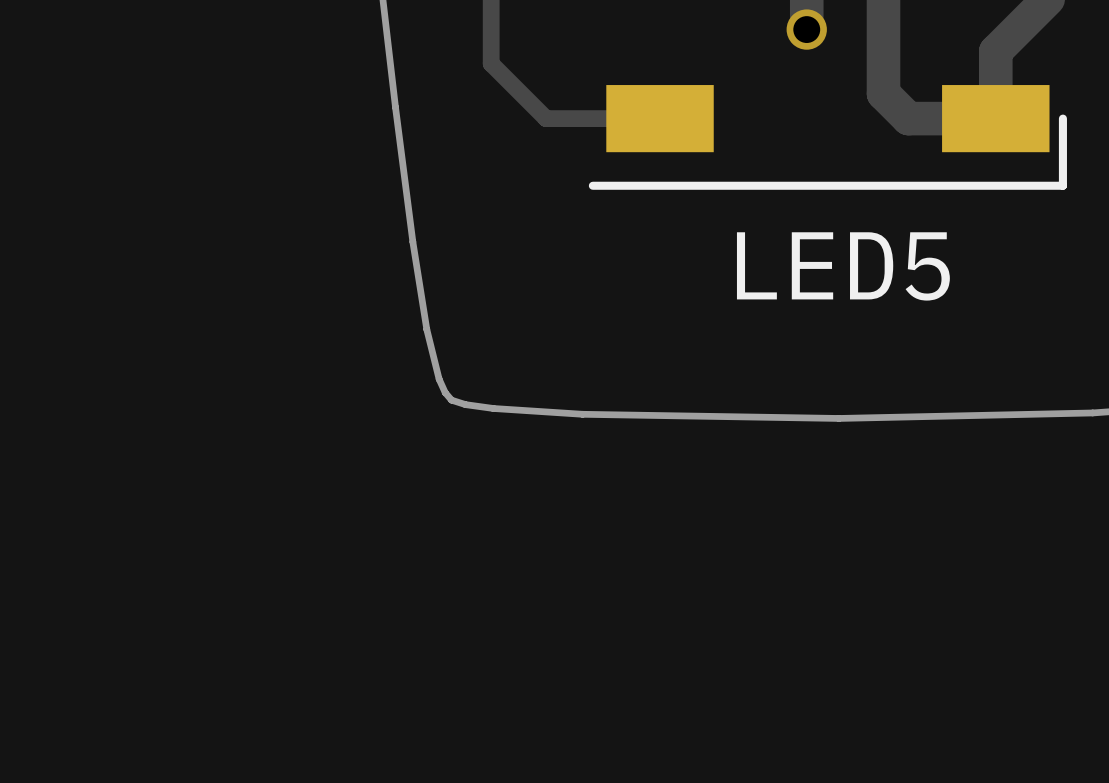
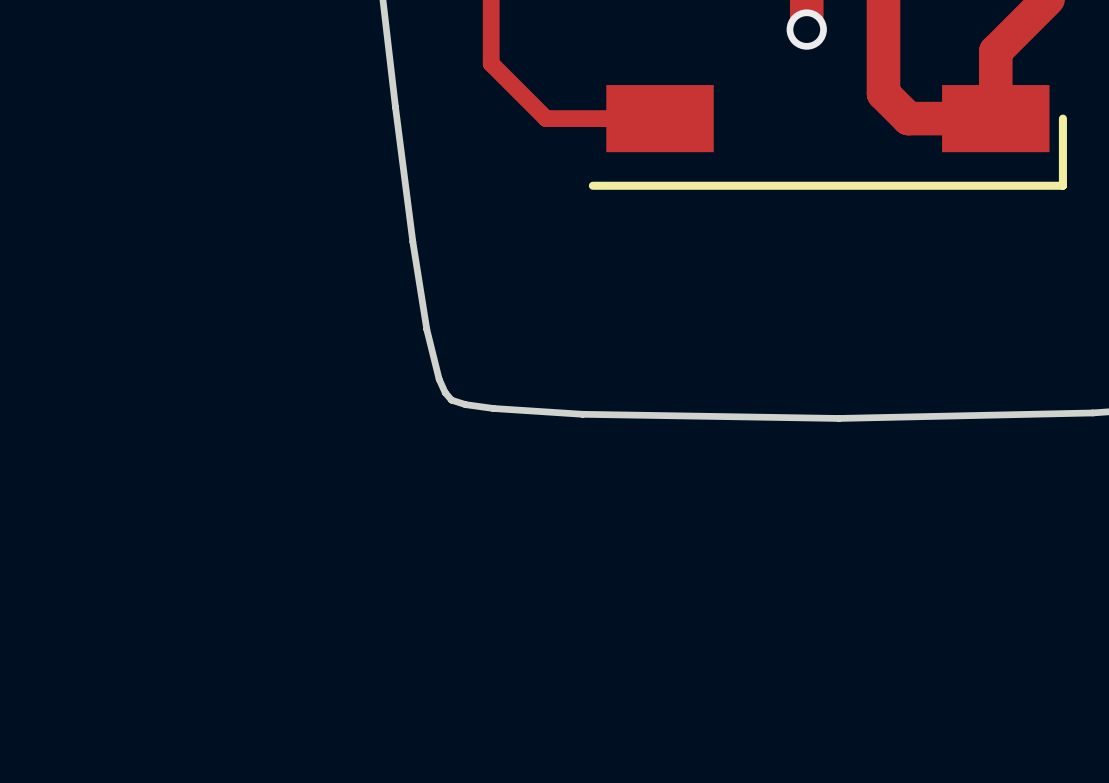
LED5 name: LED5 (843, 266) -> none

